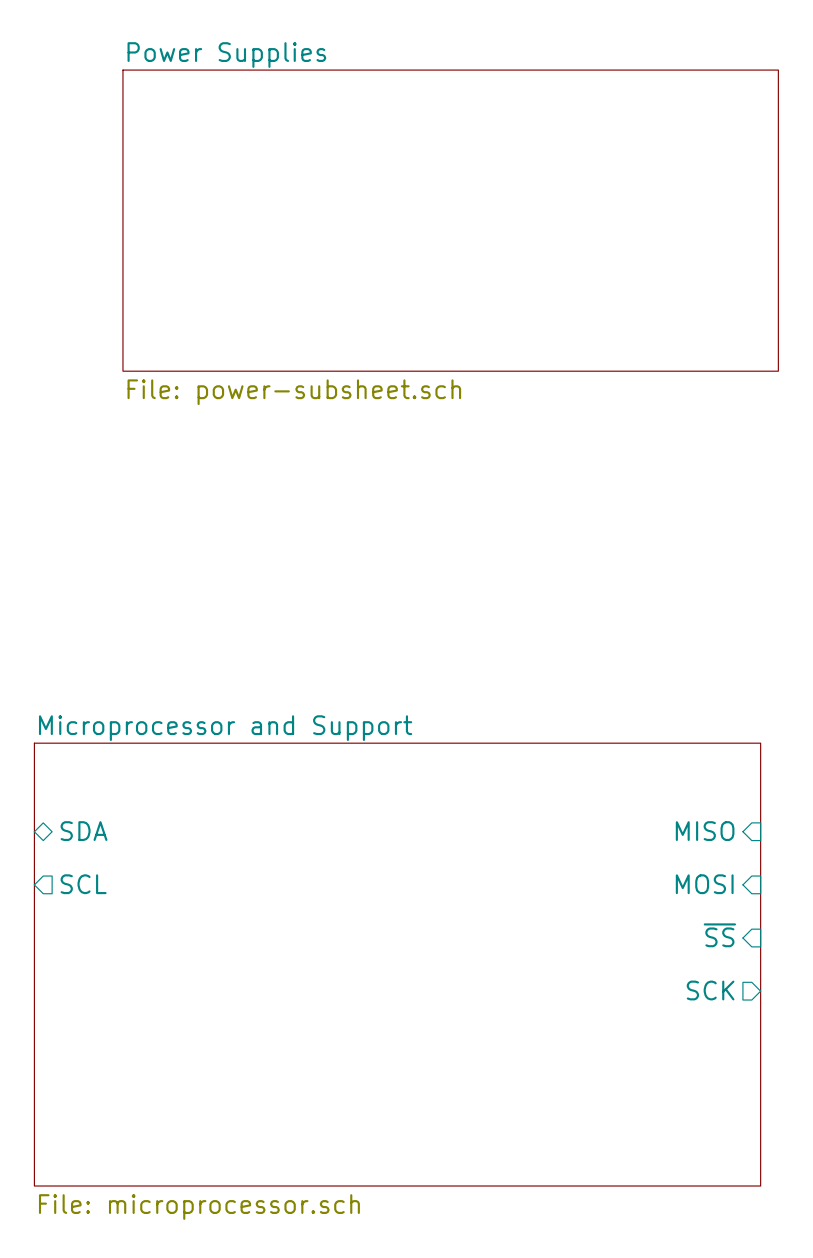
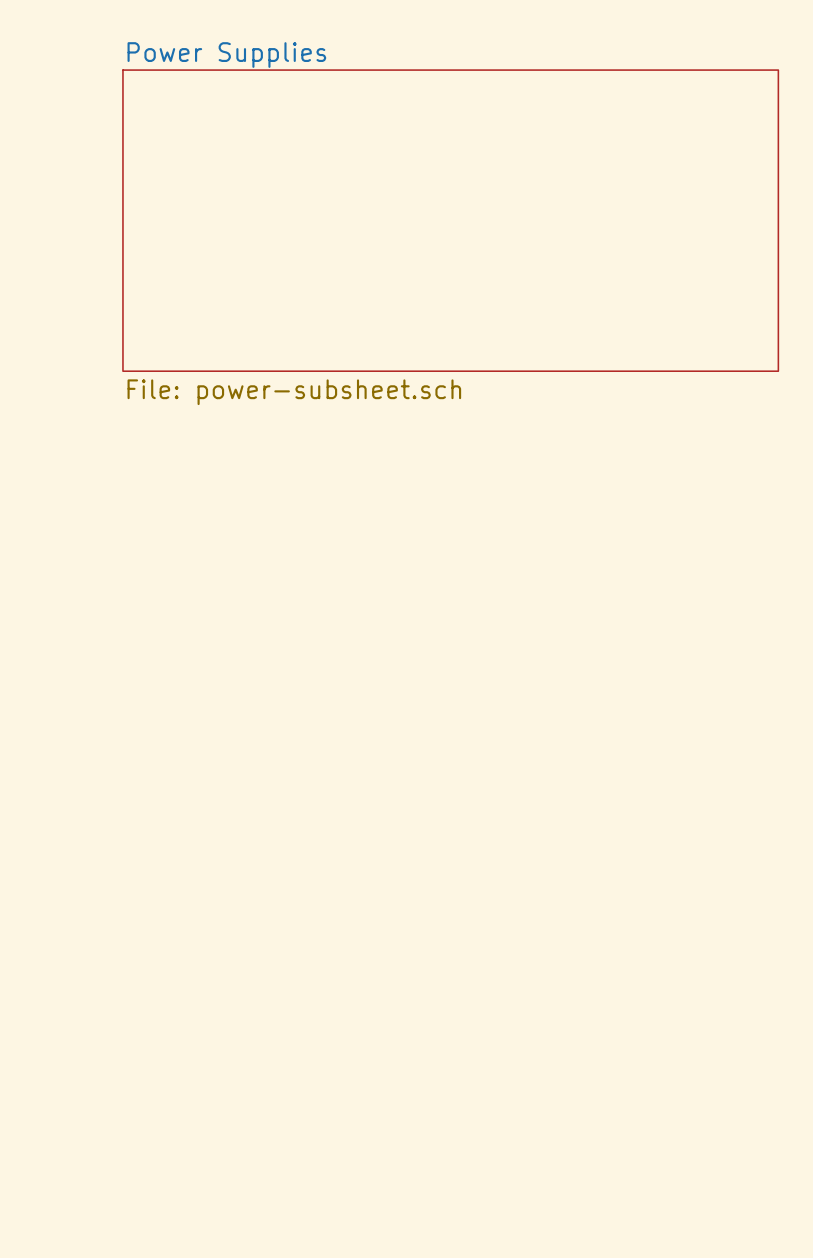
sheet pin: SDA (84, 831) -> none
sheet pin: MISO (705, 831) -> none
sheet pin: SCL (83, 884) -> none
sheet pin: MOSI (704, 884) -> none
sheet pin: ~{SS} (719, 935) -> none
sheet Microprocessor and Support: File: microprocessor.sch (397, 964) -> none
sheet pin: SCK (710, 990) -> none

